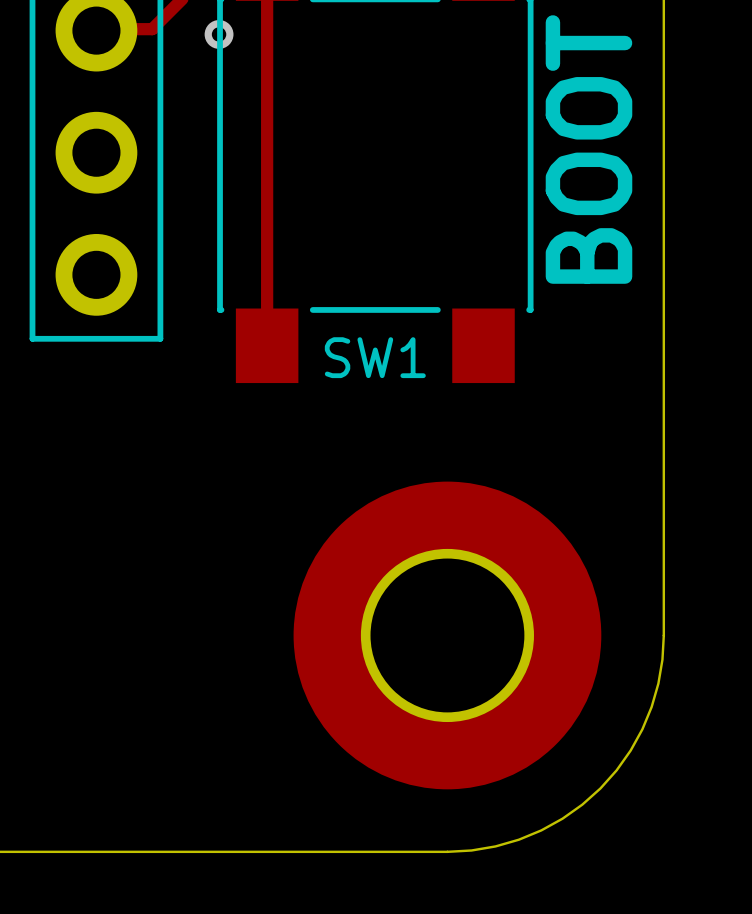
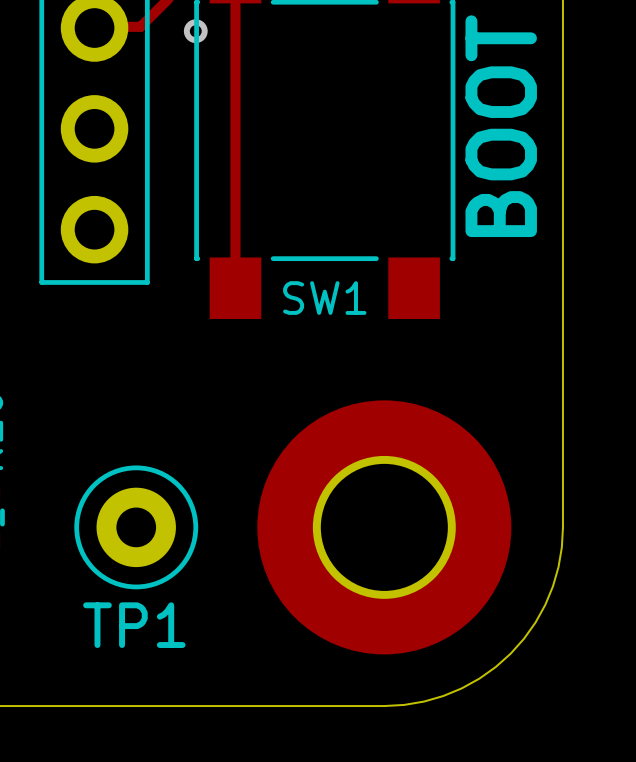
TP1: none -> (136, 527)

